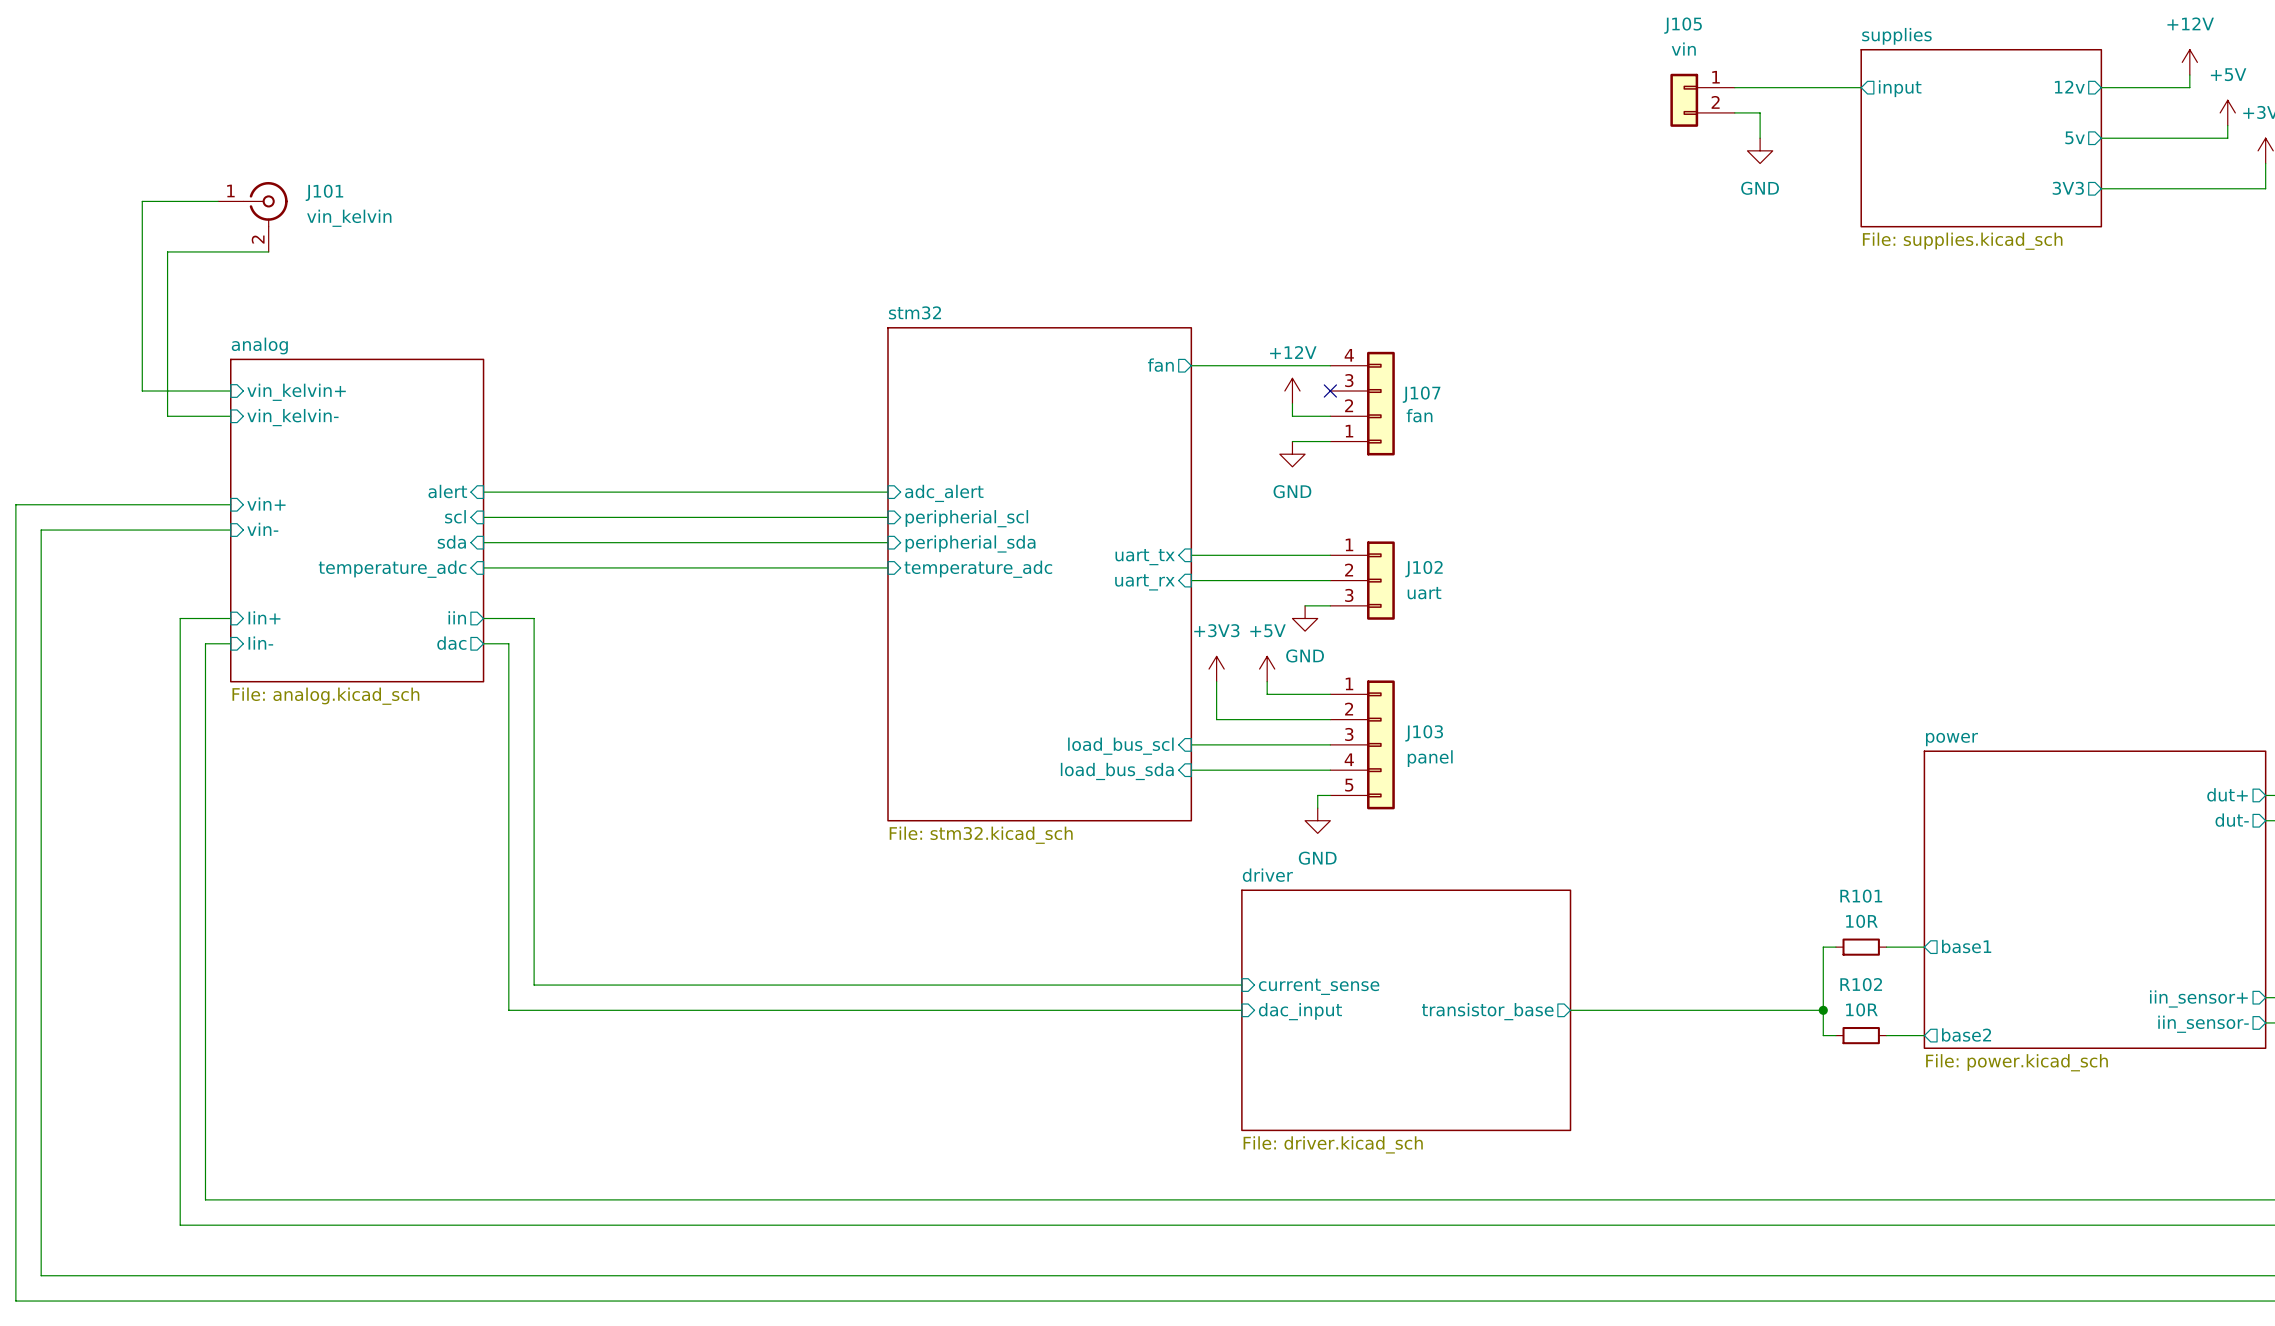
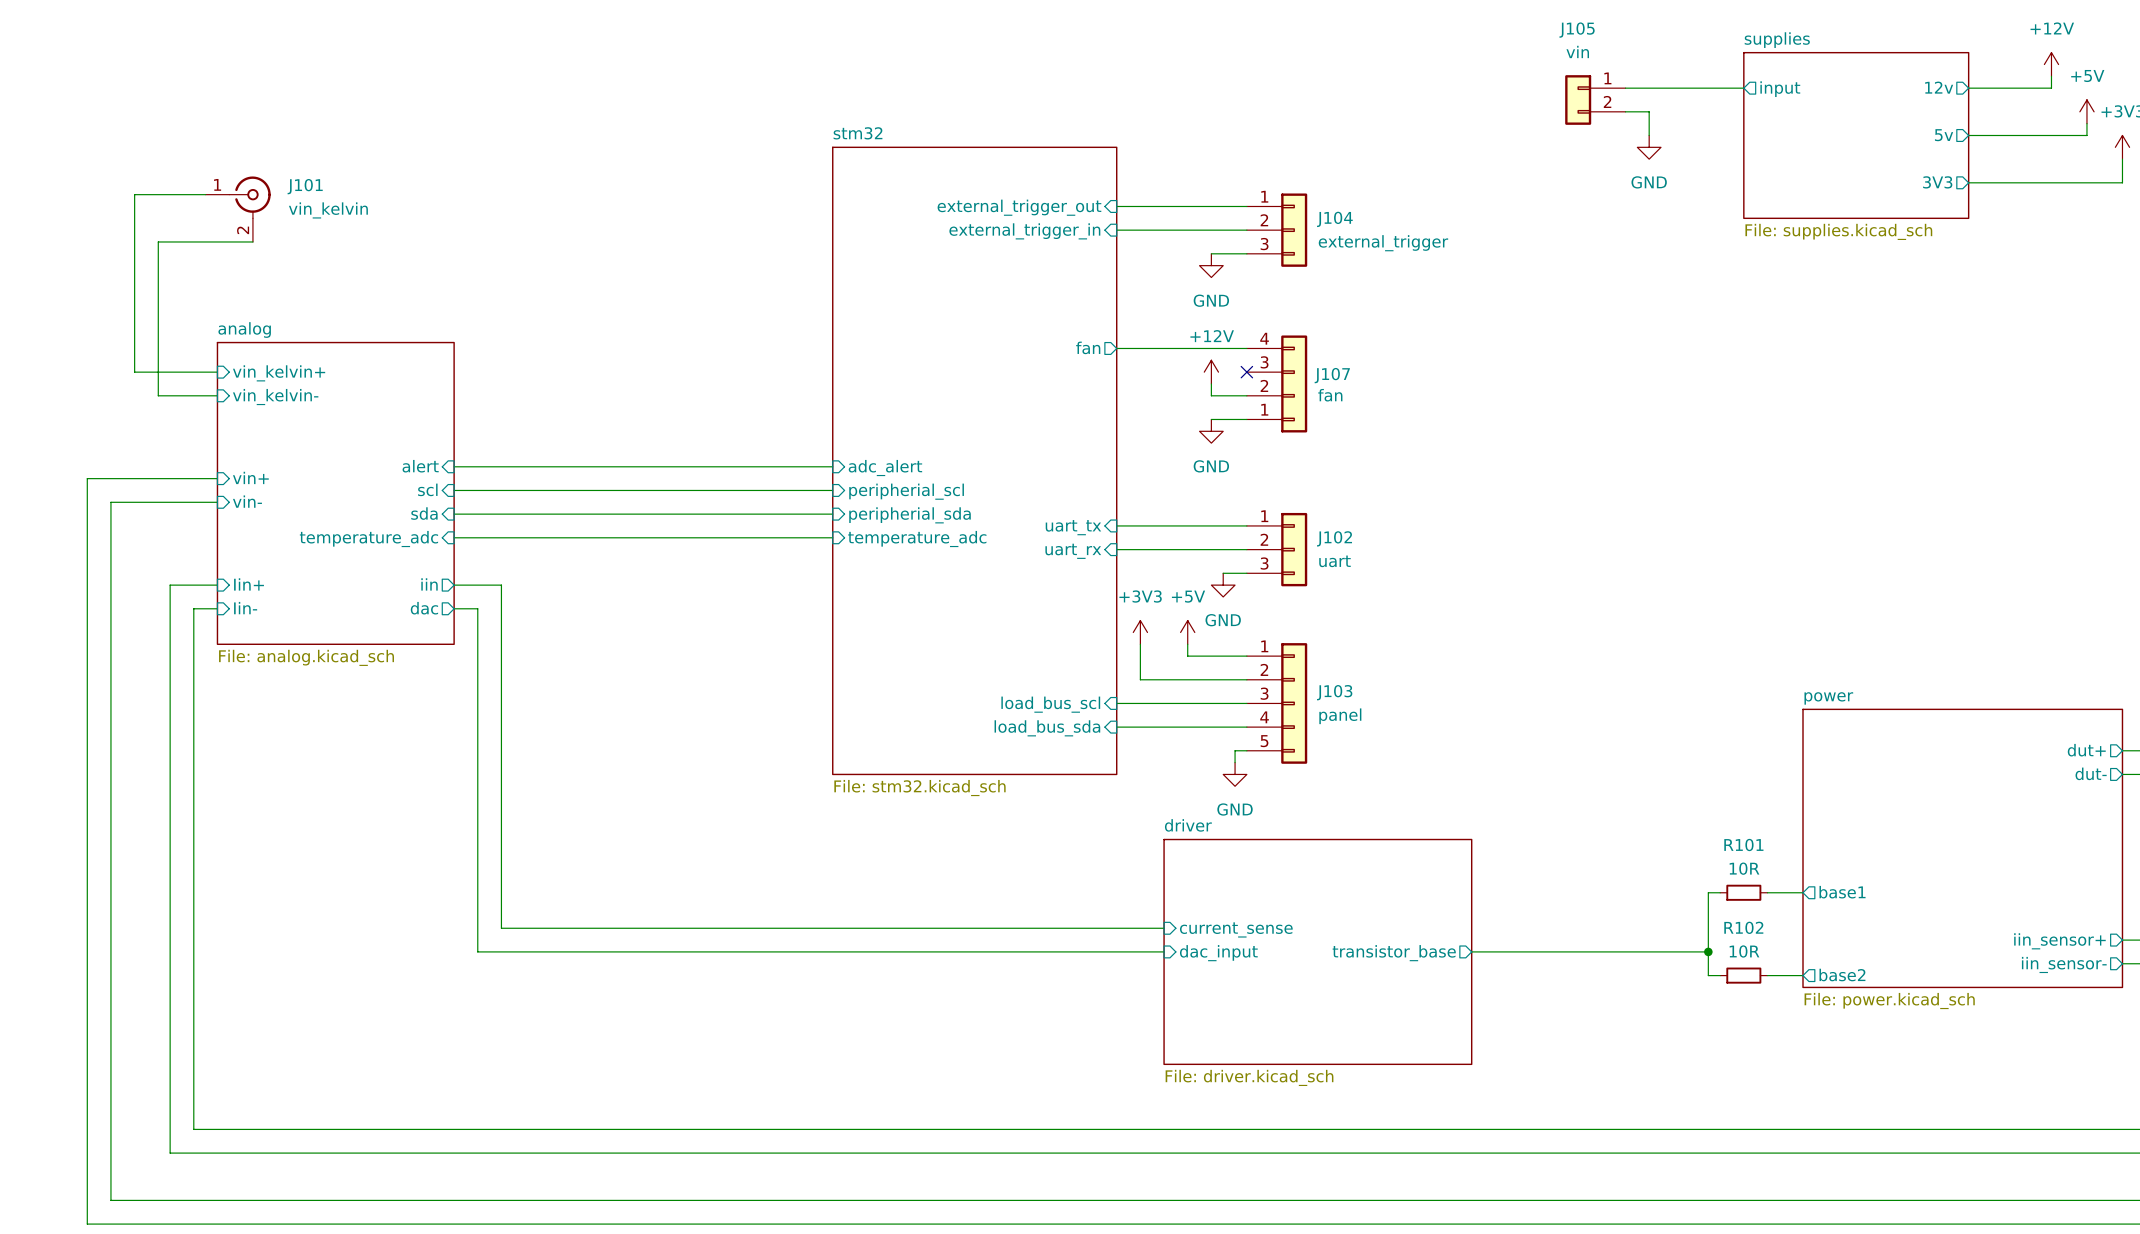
wire: none -> (1116, 206) (1246, 206)
sheet pin: none -> external_trigger_out (1019, 207)
wire: none -> (1116, 230) (1246, 230)
J104: none -> external_trigger (1277, 230)
sheet pin: none -> external_trigger_in (1024, 231)
wire: none -> (1211, 253) (1246, 253)
power symbol: none -> GND (1211, 265)
sheet stm32 name position: stm32 (914, 312) -> stm32 (858, 133)
sheet stm32 shape: [887, 327, 1193, 822] -> [832, 146, 1118, 776]
wire: (91, 504) (15, 504) (15, 1301) (91, 1301) -> (87, 478) (87, 1224)
wire: (117, 530) (41, 530) (41, 1275) (117, 1275) -> (110, 502) (110, 1200)

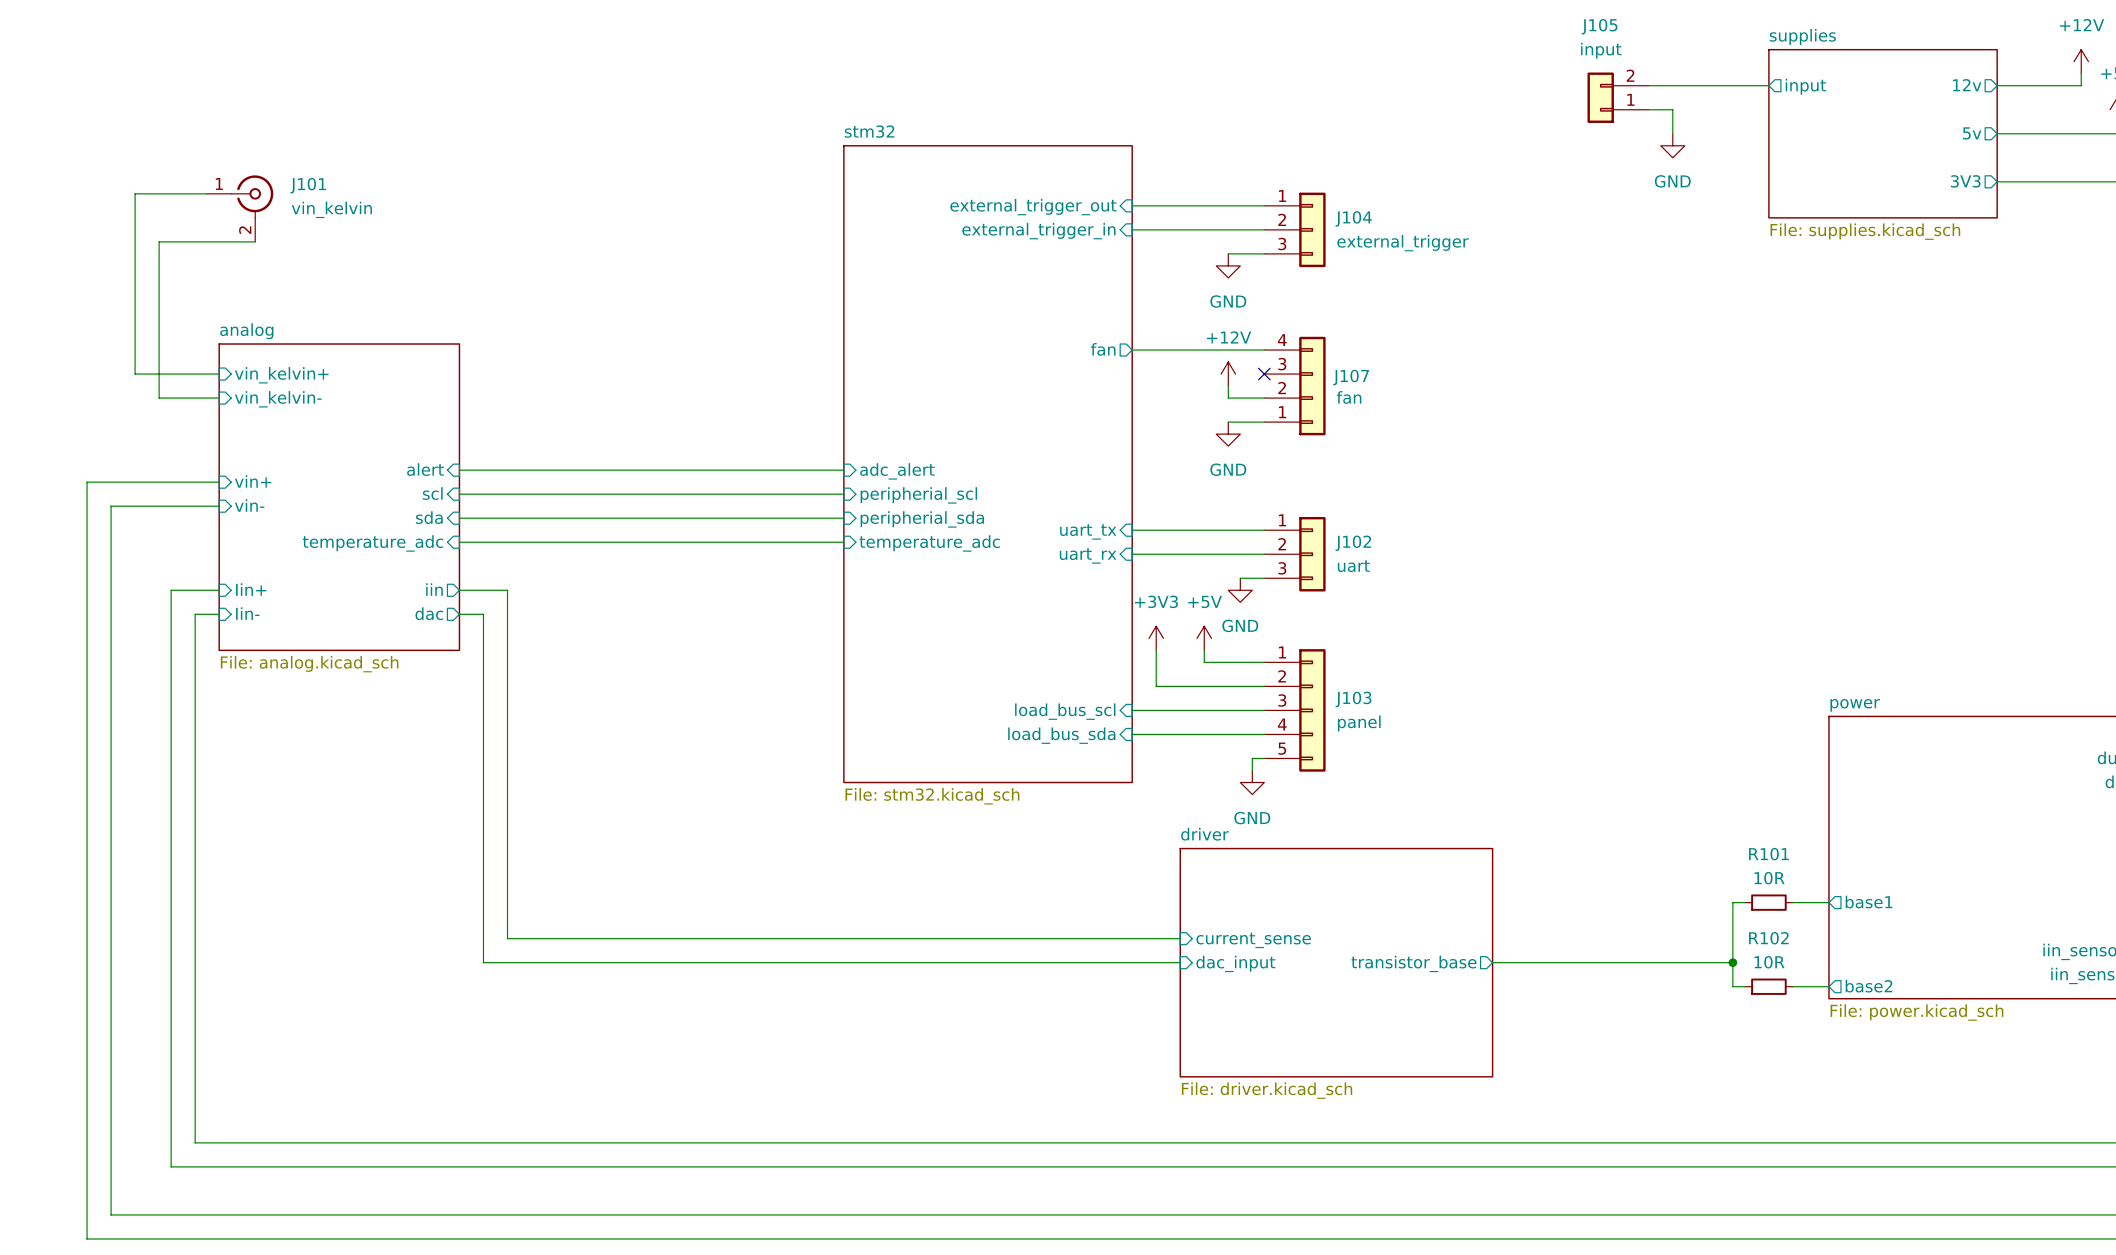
J105 value: vin (1577, 51) -> input (1601, 50)
J105 flip: as is (1578, 99) -> up-down (1600, 97)

